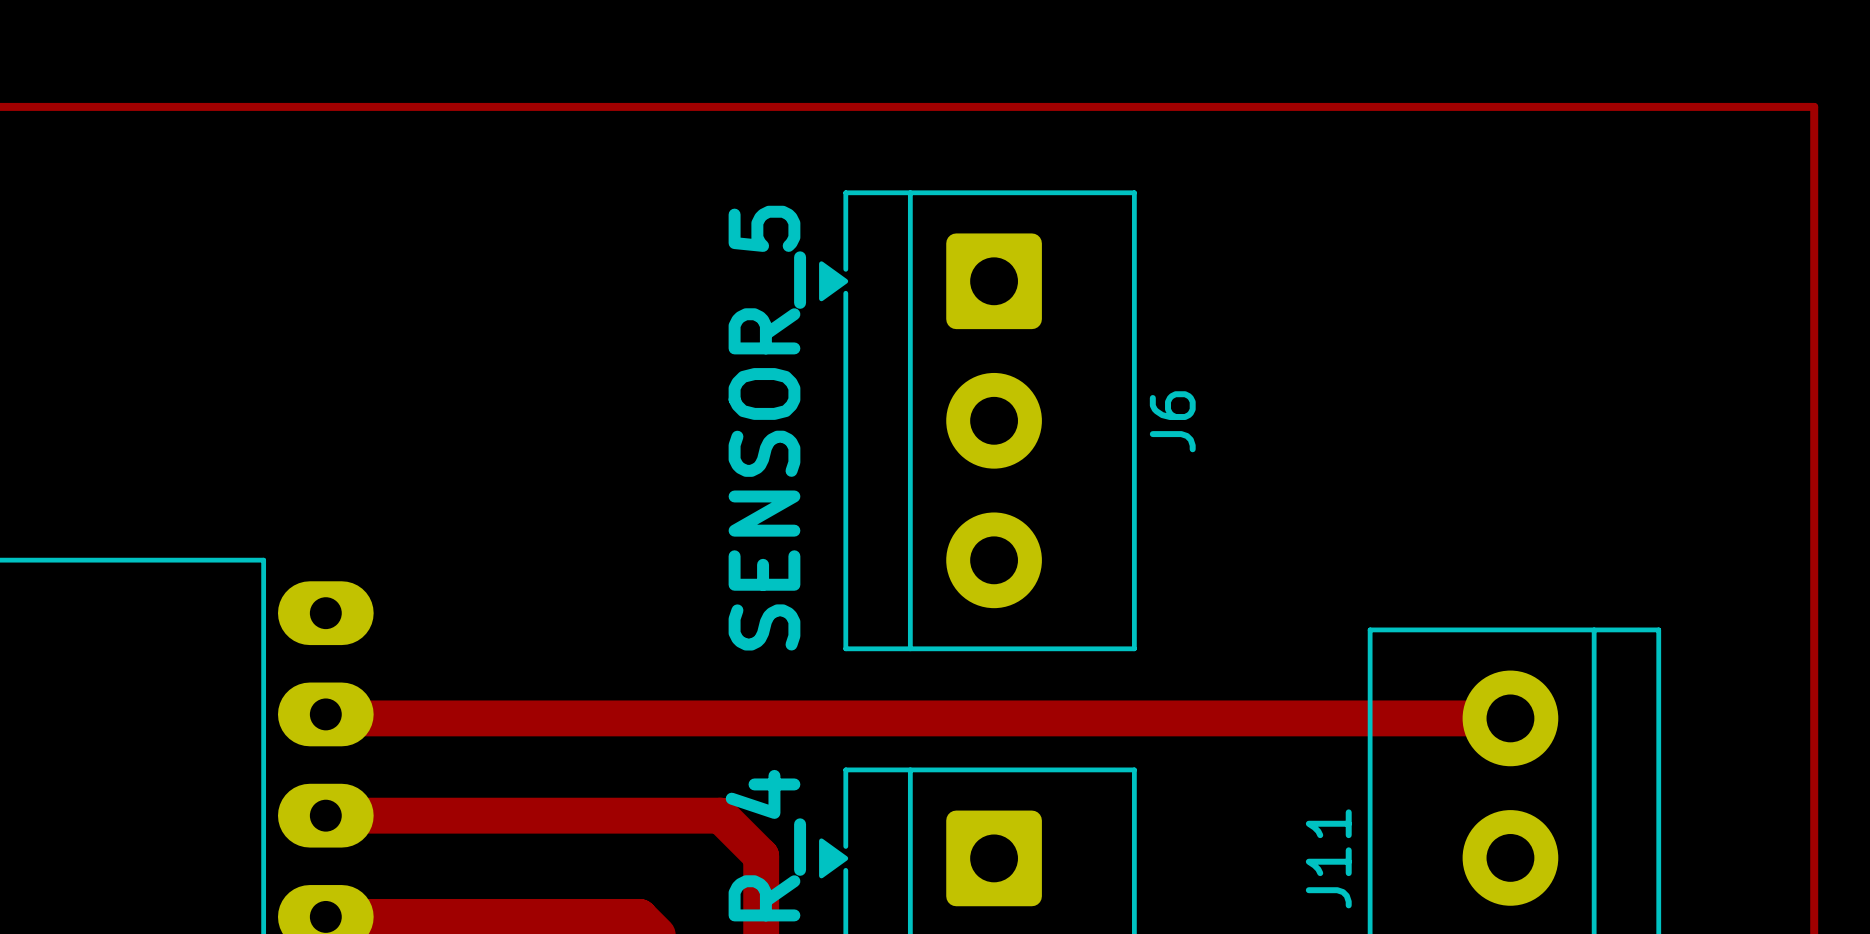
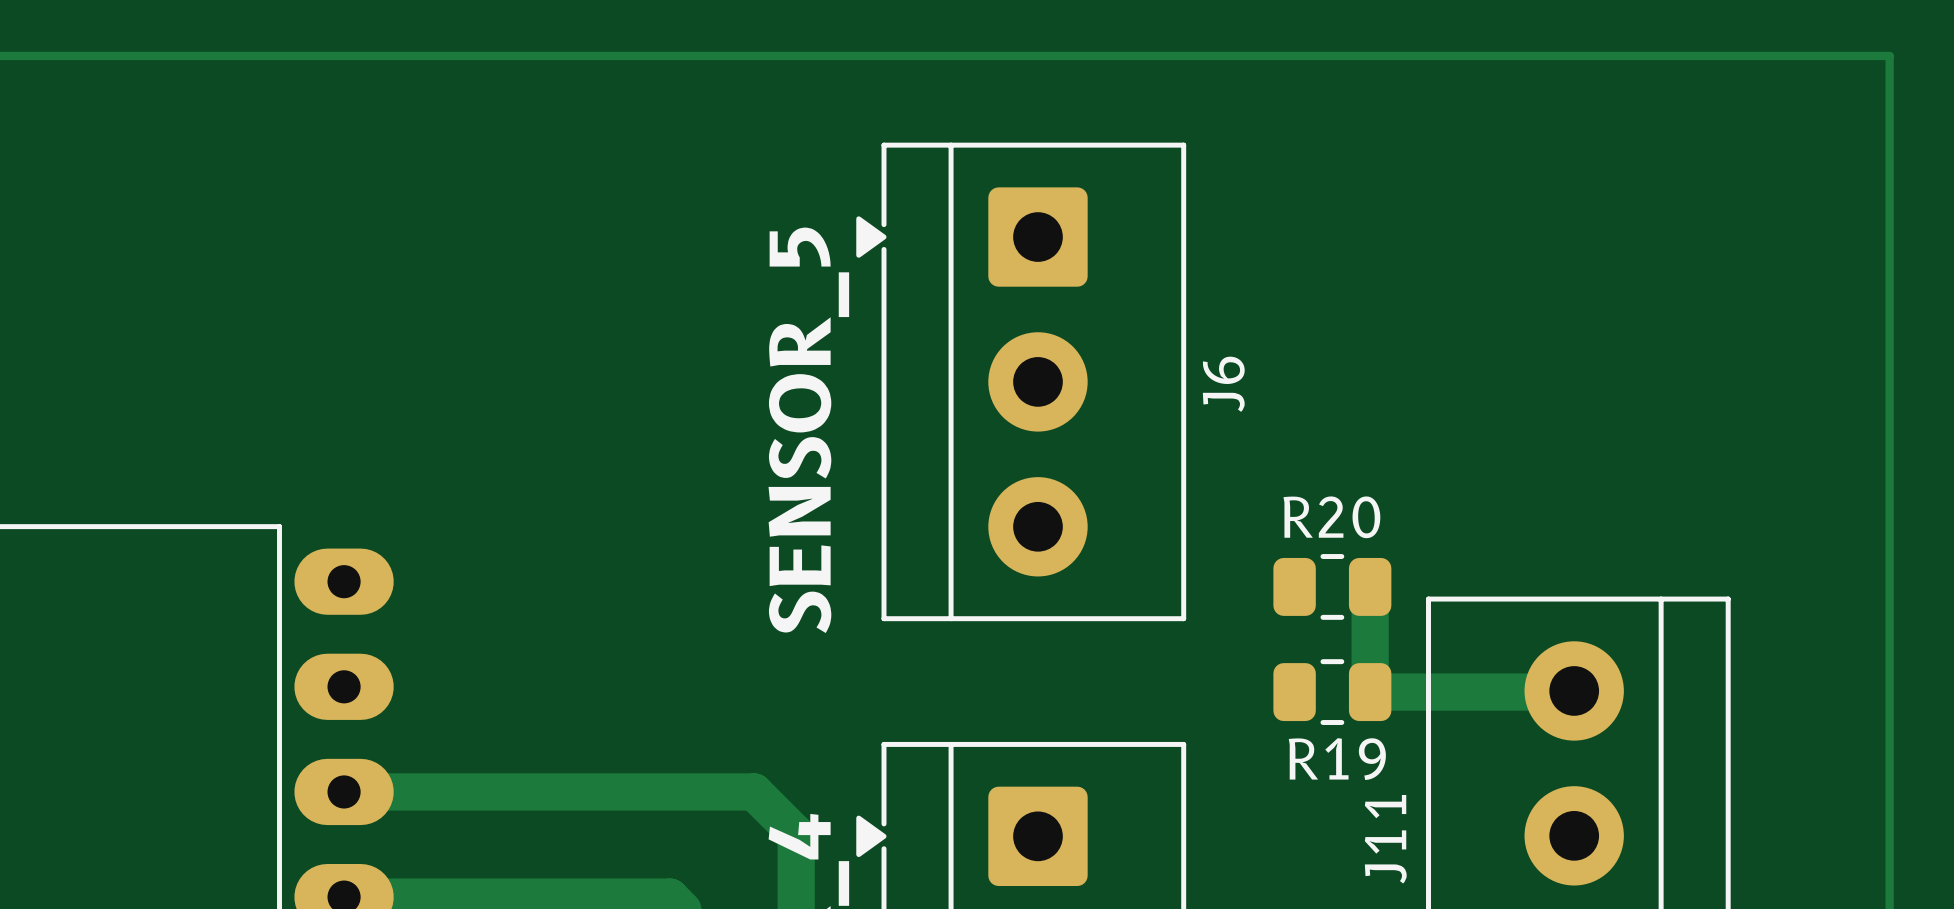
R20: none -> (1332, 586)
track: (329, 718) (1510, 718) -> (1370, 586) (1370, 692) (1574, 690)
R19: none -> (1332, 692)

